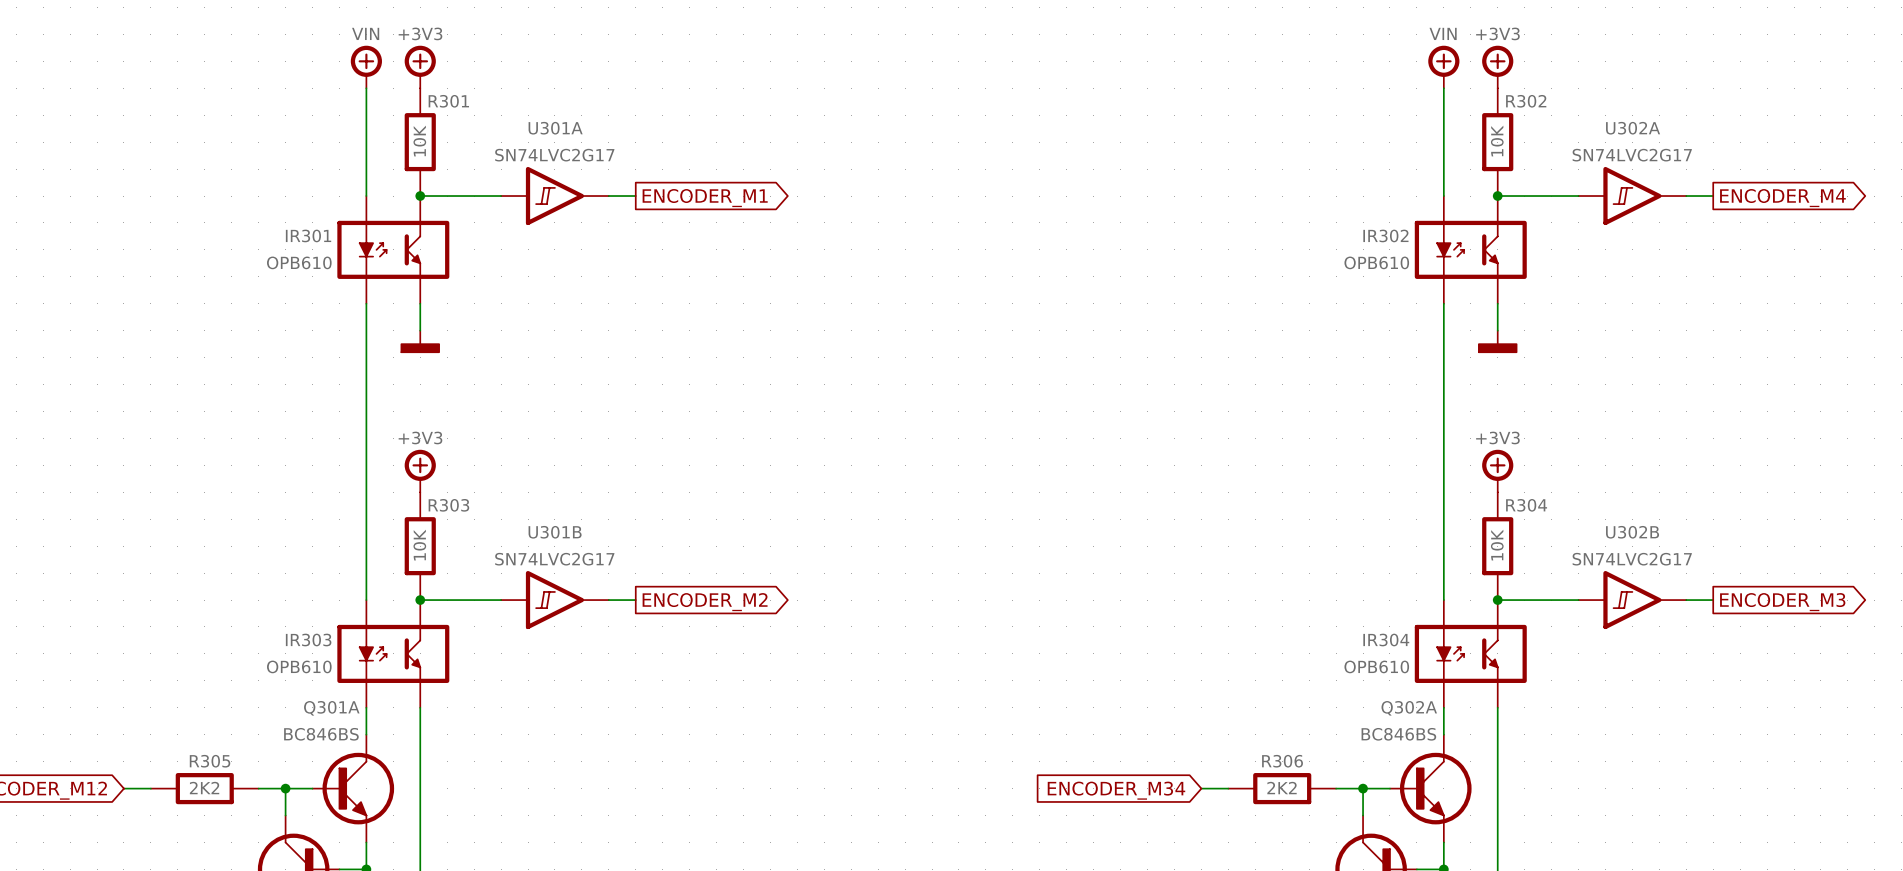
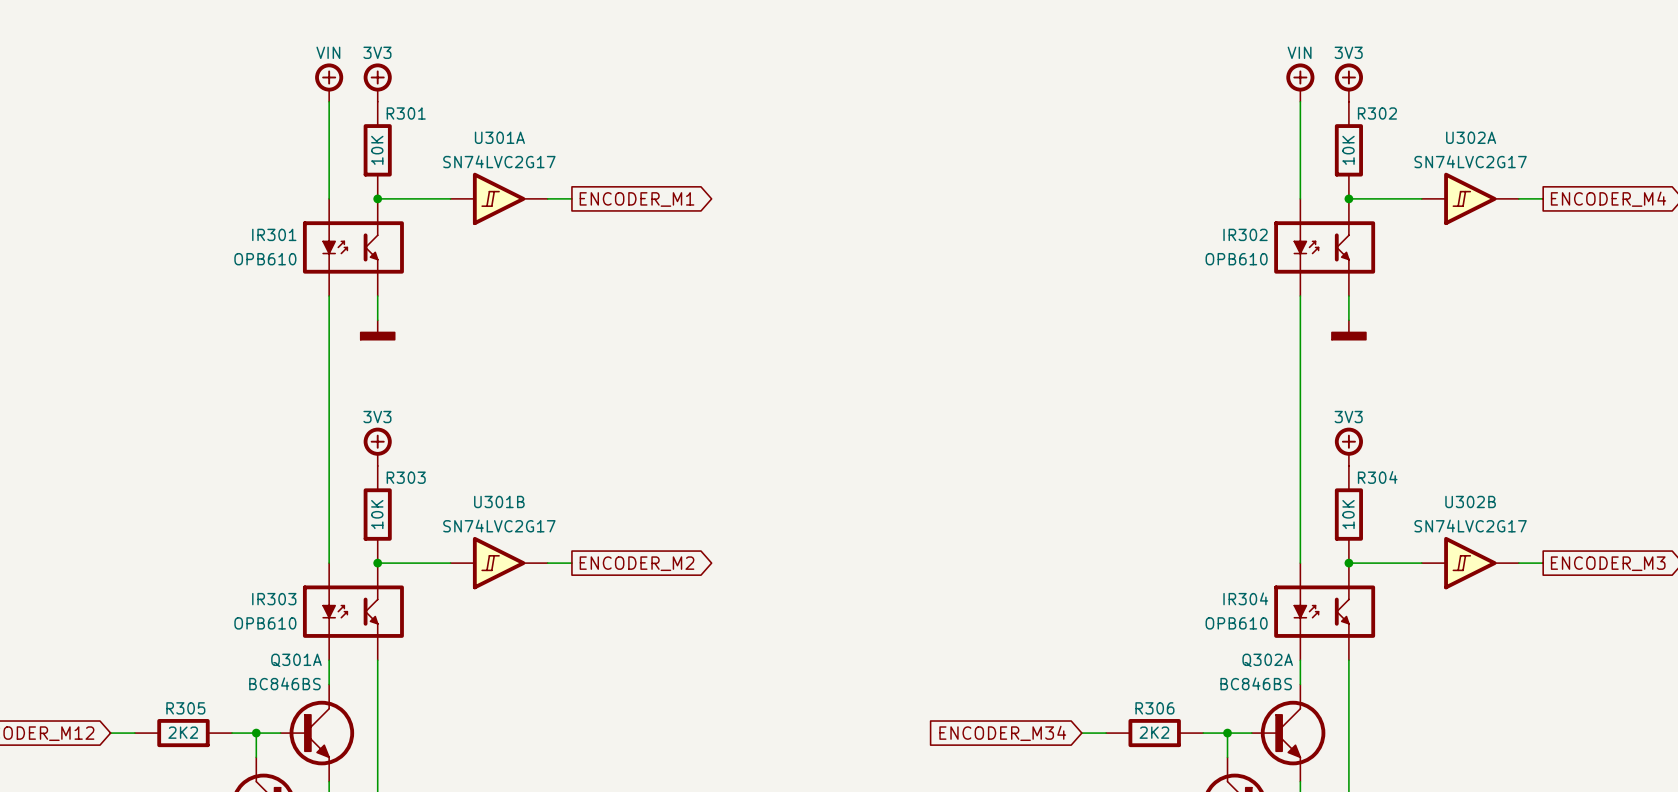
power symbol text: +3V3 (420, 33) -> 3V3 (377, 52)
power symbol text: +3V3 (1497, 33) -> 3V3 (1348, 52)
power symbol text: +3V3 (420, 437) -> 3V3 (377, 417)
power symbol text: +3V3 (1497, 437) -> 3V3 (1348, 417)

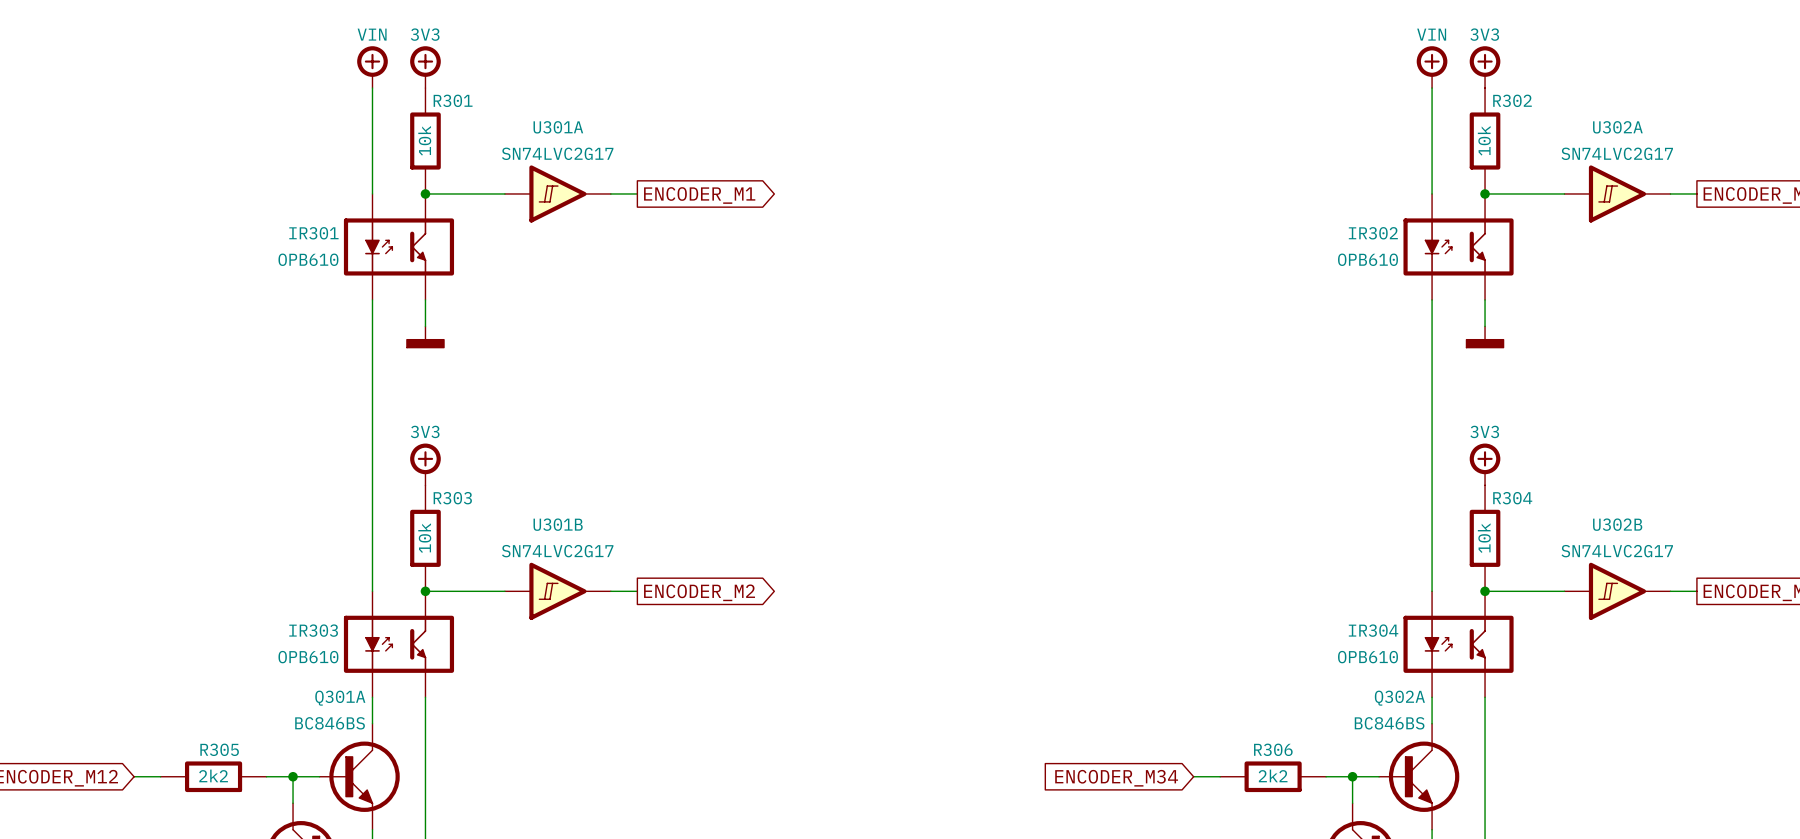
R301 value: 10K (377, 150) -> 10k (424, 140)
R302 value: 10K (1348, 150) -> 10k (1484, 140)
R303 value: 10K (377, 514) -> 10k (424, 538)
R304 value: 10K (1348, 514) -> 10k (1484, 538)
R305 value: 2K2 (183, 732) -> 2k2 (213, 775)
R306 value: 2K2 (1154, 732) -> 2k2 (1273, 775)

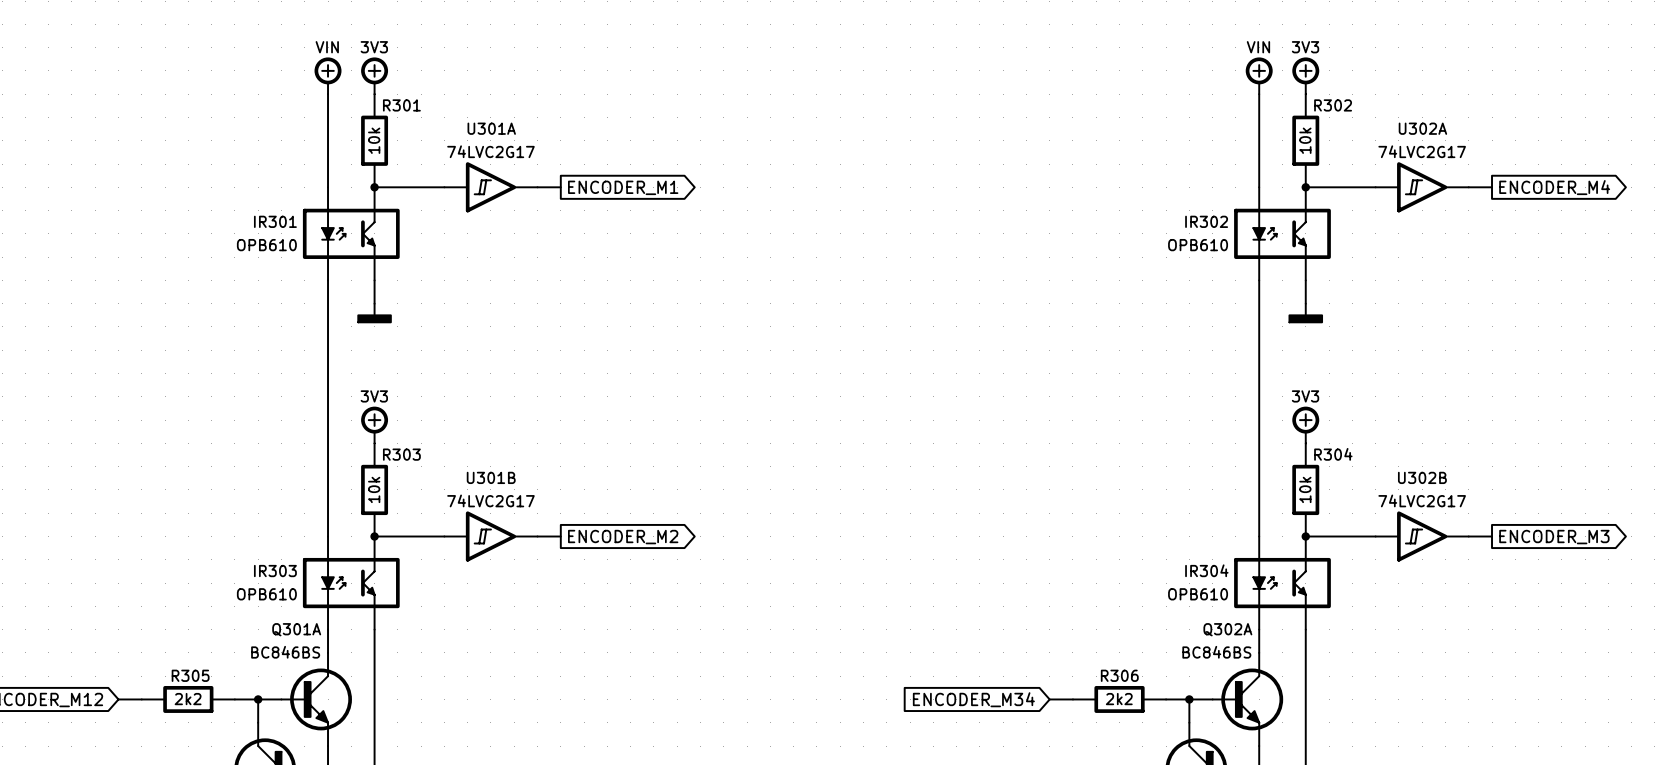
U301A value: SN74LVC2G17 (557, 153) -> 74LVC2G17 (490, 151)
U302A value: SN74LVC2G17 (1617, 153) -> 74LVC2G17 (1422, 151)
U301B value: SN74LVC2G17 (557, 551) -> 74LVC2G17 (490, 500)
U302B value: SN74LVC2G17 (1617, 551) -> 74LVC2G17 (1422, 500)

